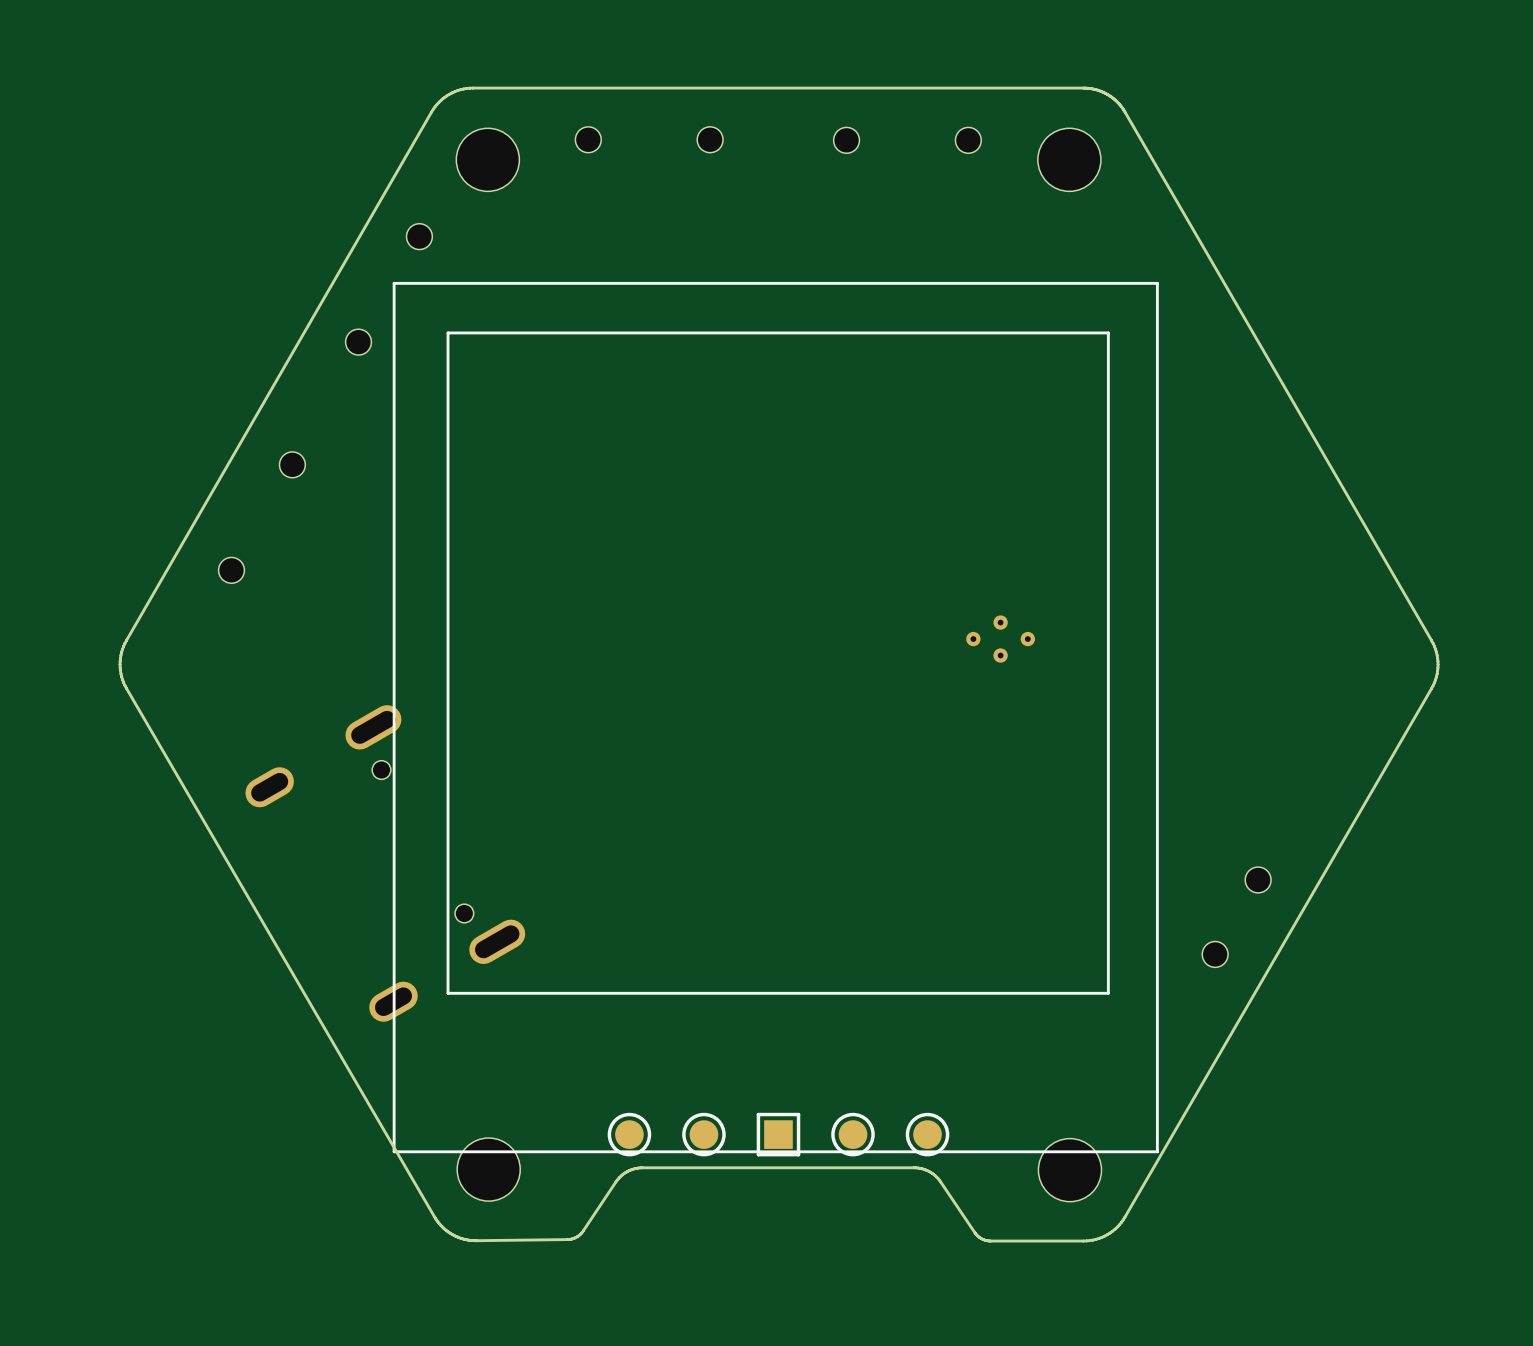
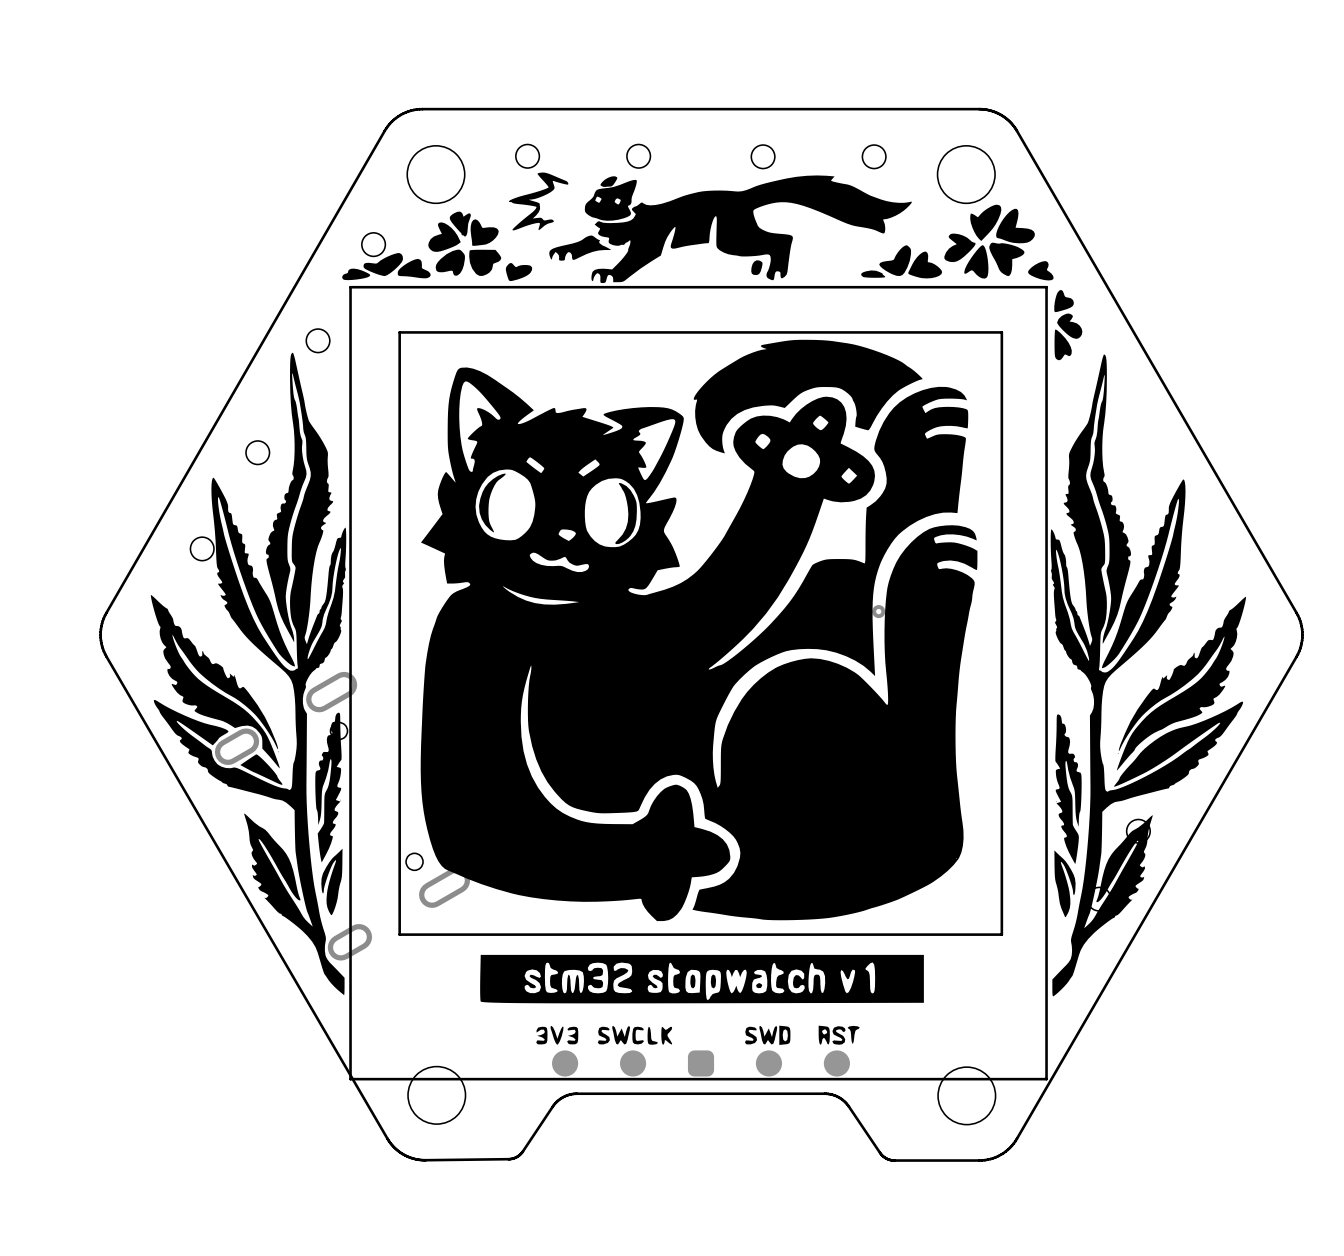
drawing: none -> [150, 172, 1247, 1045]
part footprint: [607, 1112, 652, 1157] -> [552, 1050, 579, 1077]
part footprint: [682, 1112, 726, 1157] -> [619, 1050, 647, 1077]
part footprint: [756, 1112, 801, 1157] -> [687, 1050, 715, 1077]
part footprint: [831, 1112, 875, 1157] -> [755, 1050, 783, 1077]
part footprint: [905, 1112, 950, 1157] -> [823, 1050, 850, 1077]

